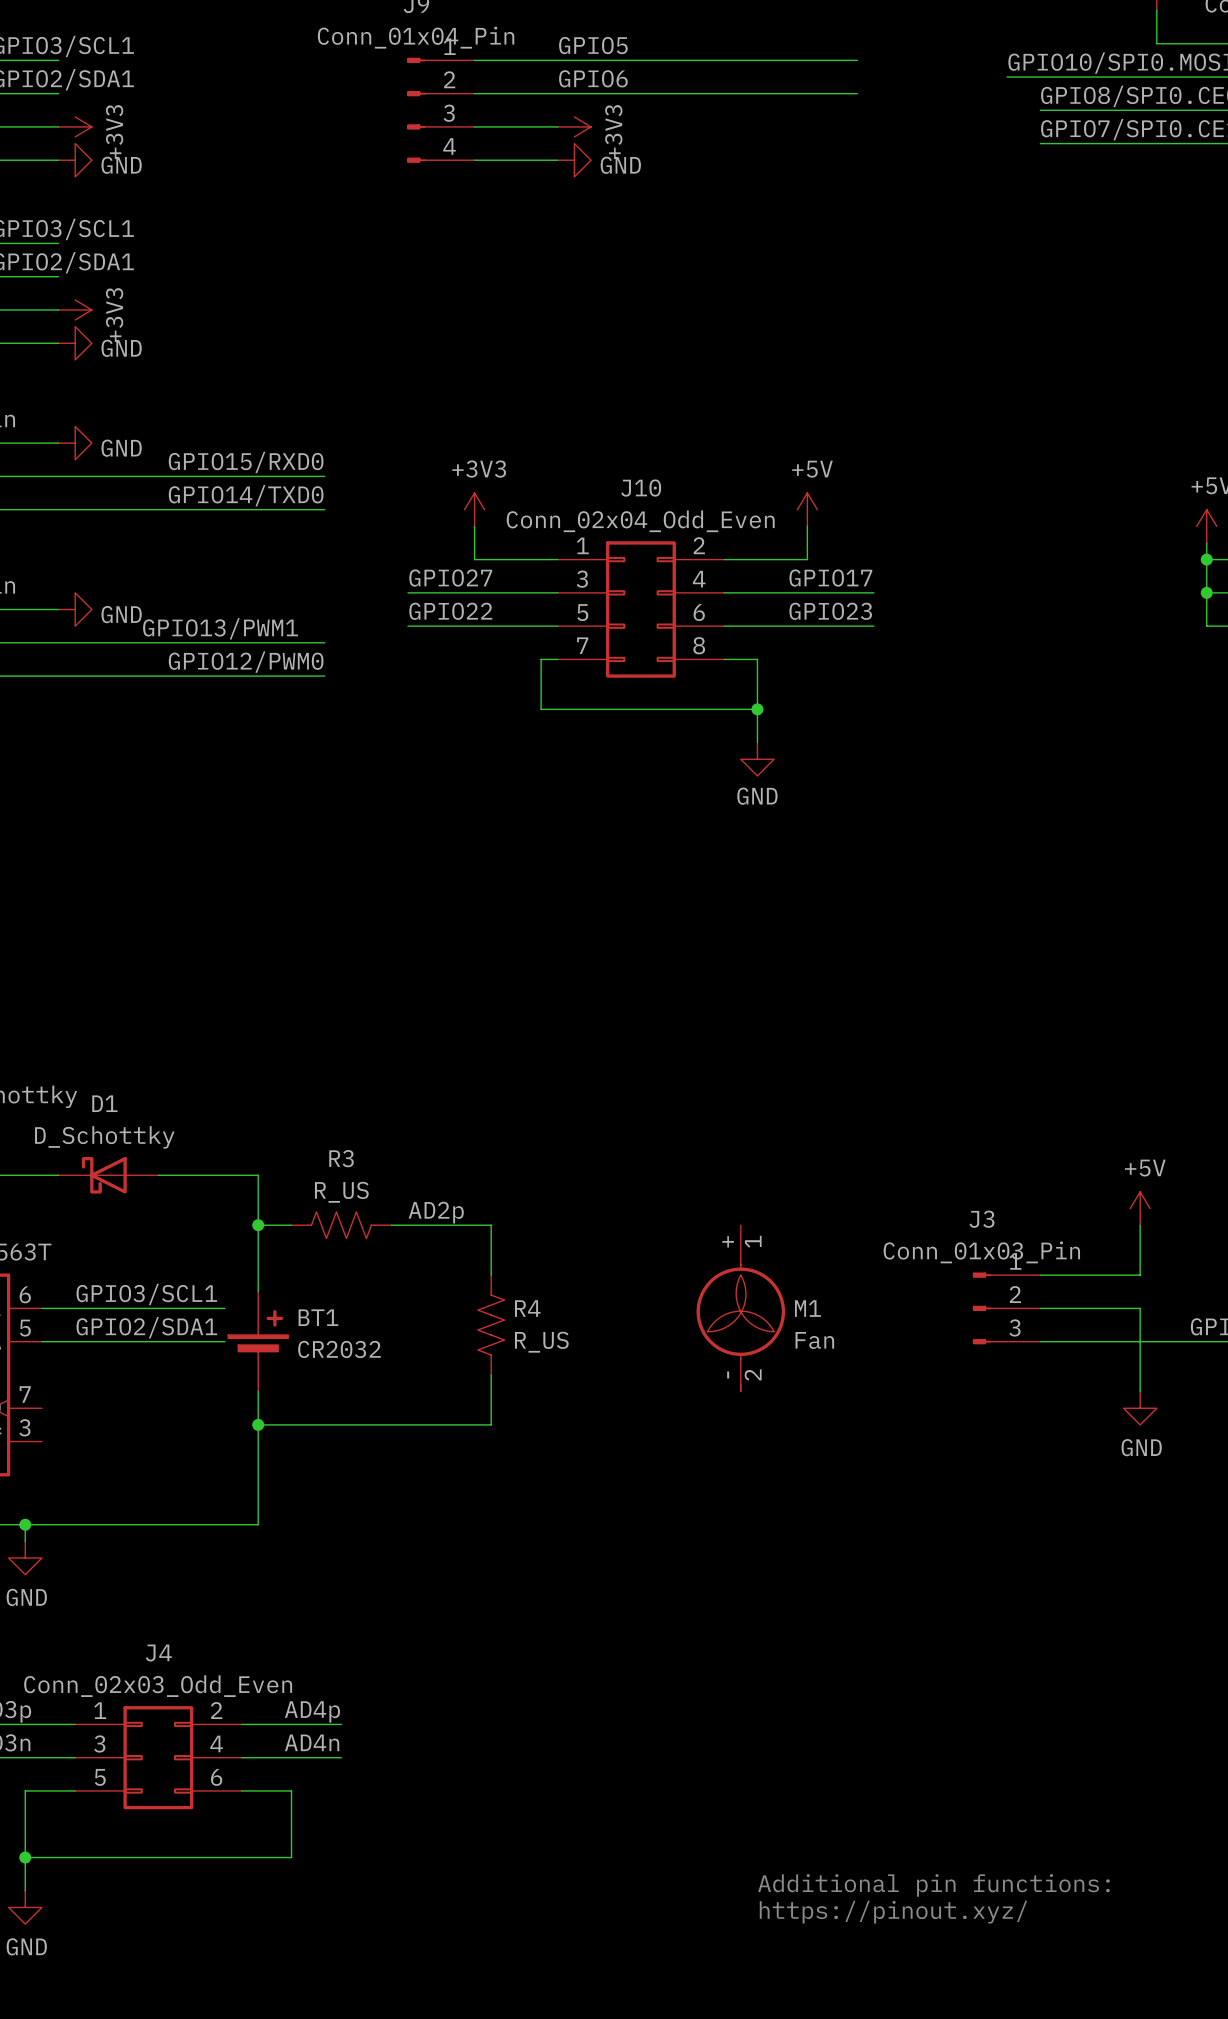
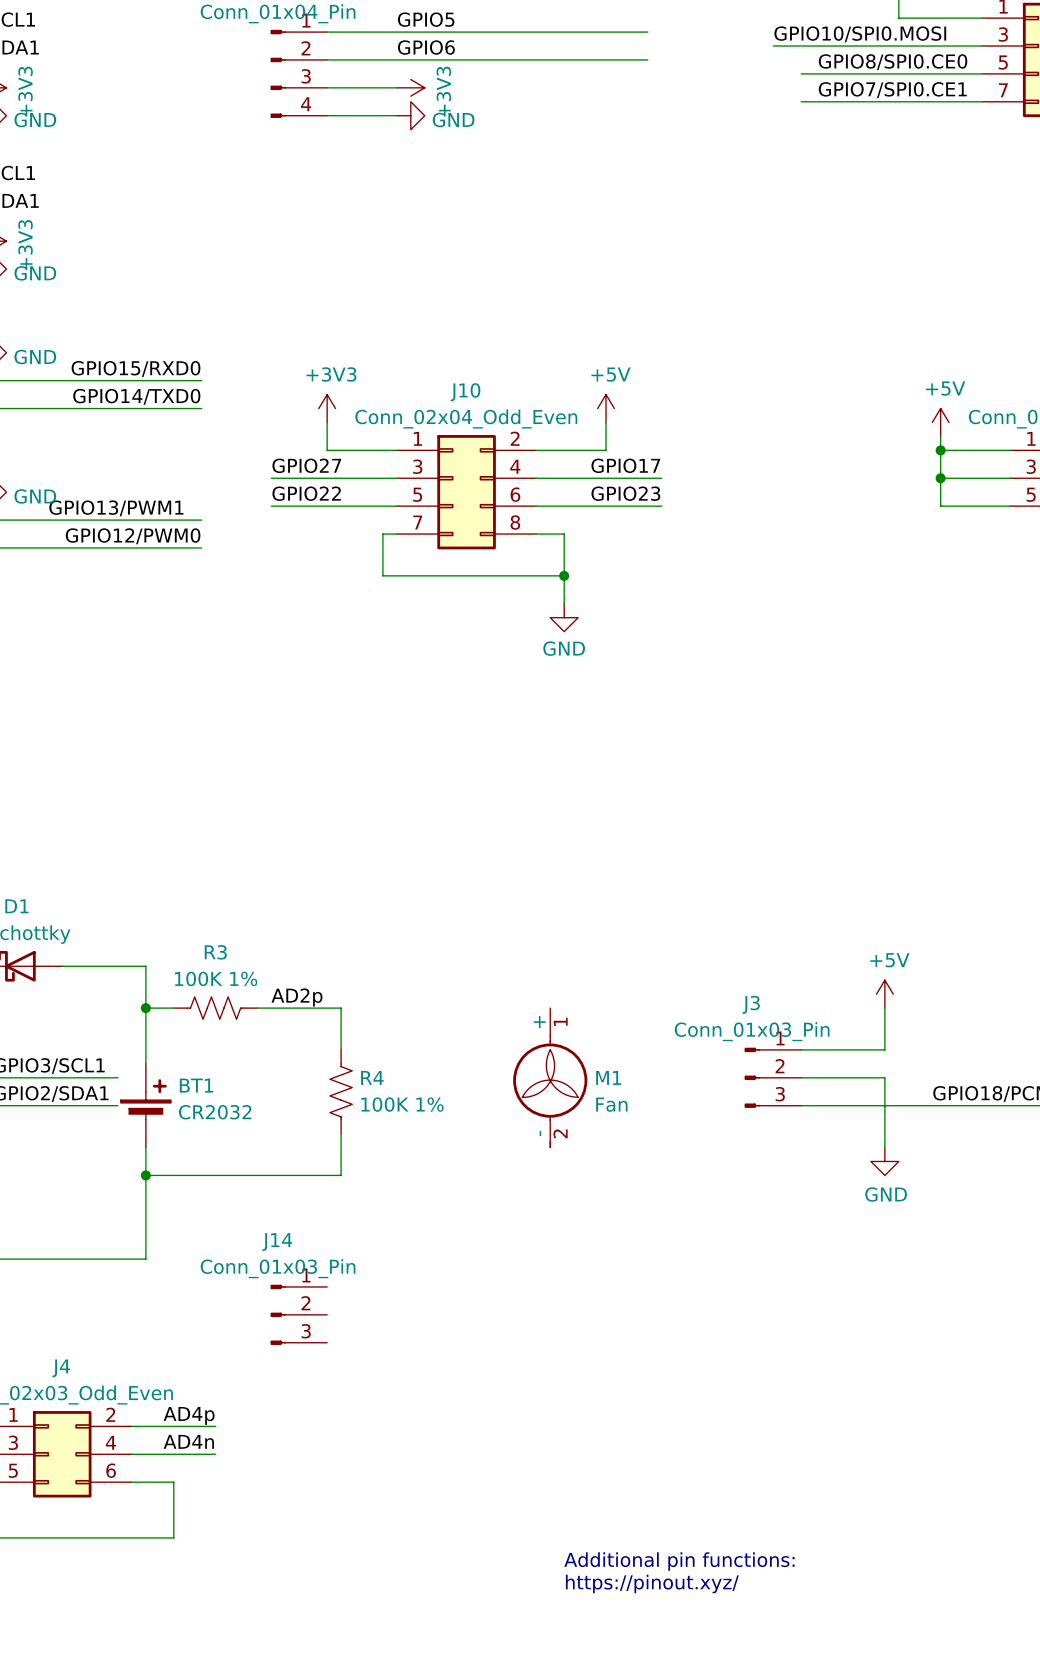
R3 value: R_US (341, 1192) -> 100K 1% (216, 978)
R4 value: R_US (541, 1342) -> 100K 1% (402, 1104)
J14: none -> Conn_01x03_Pin (298, 1314)

